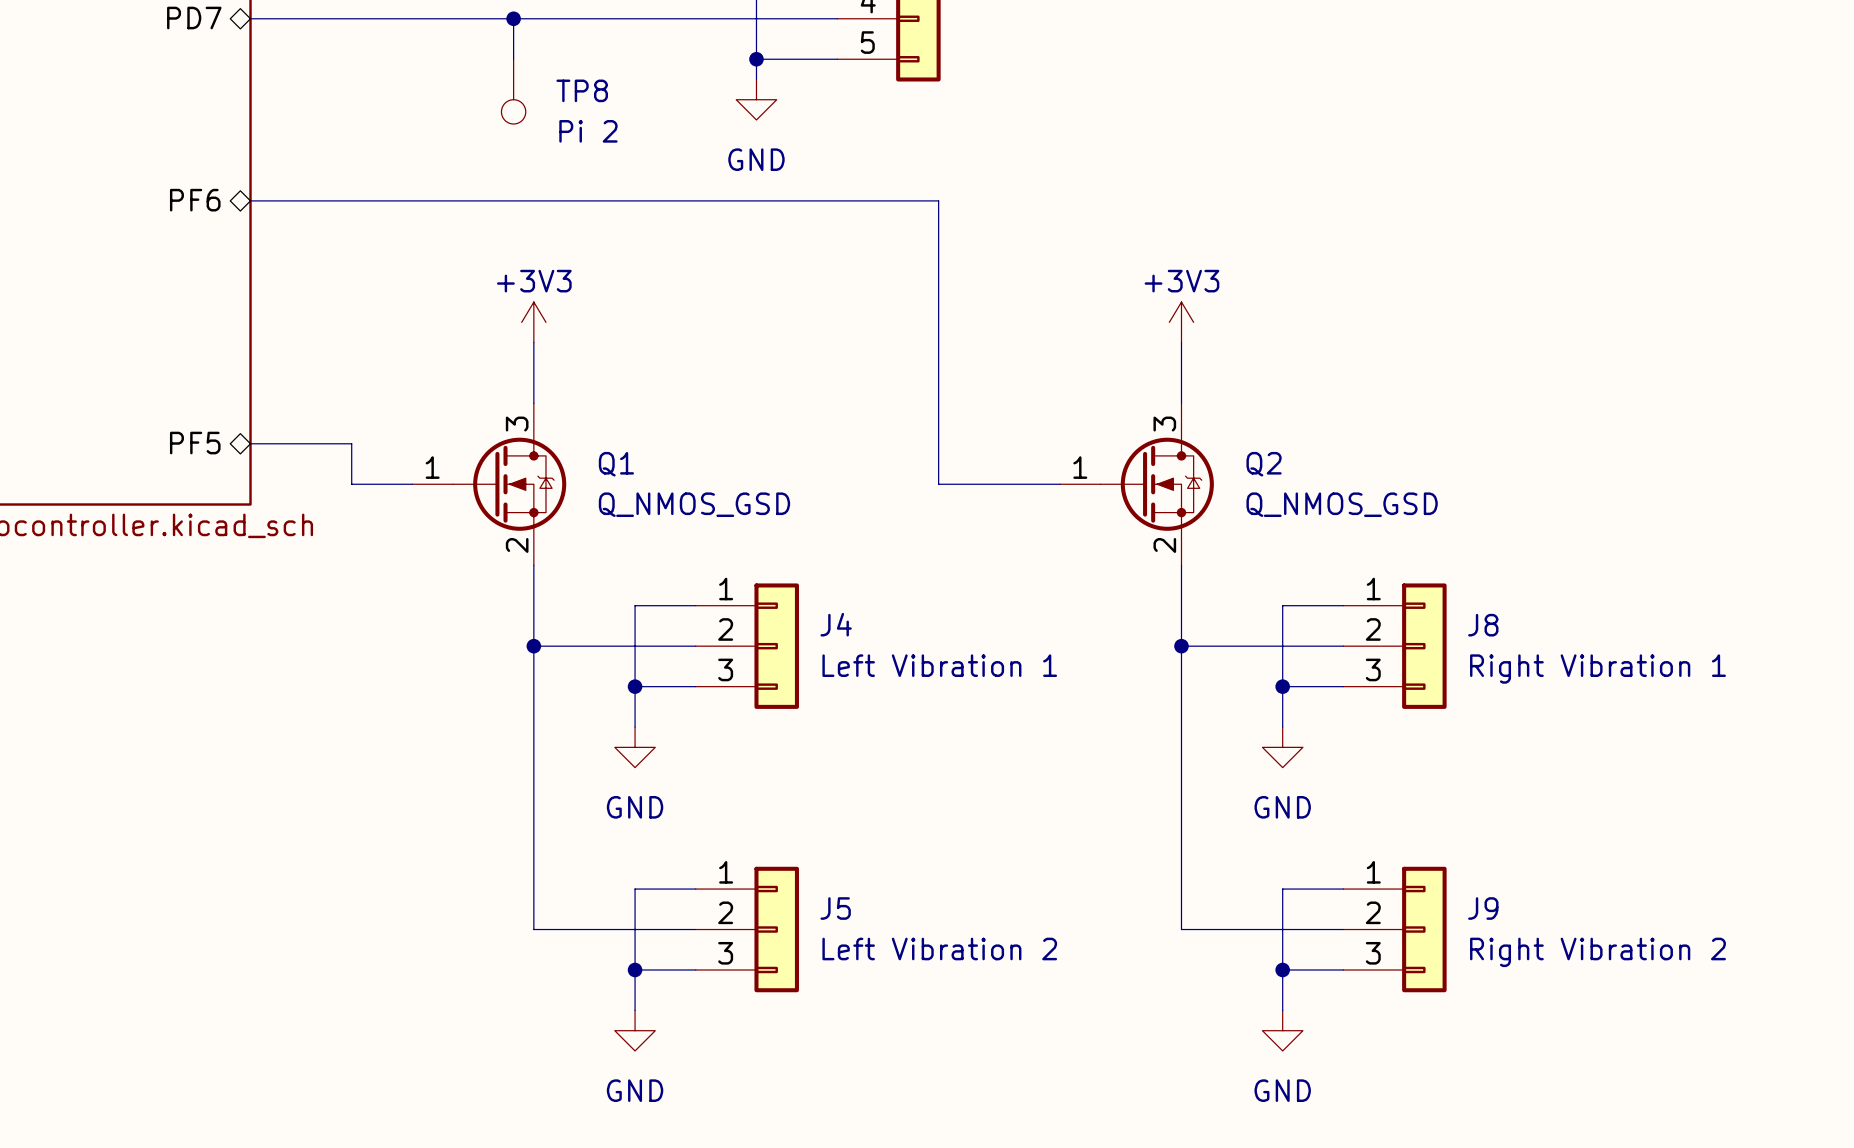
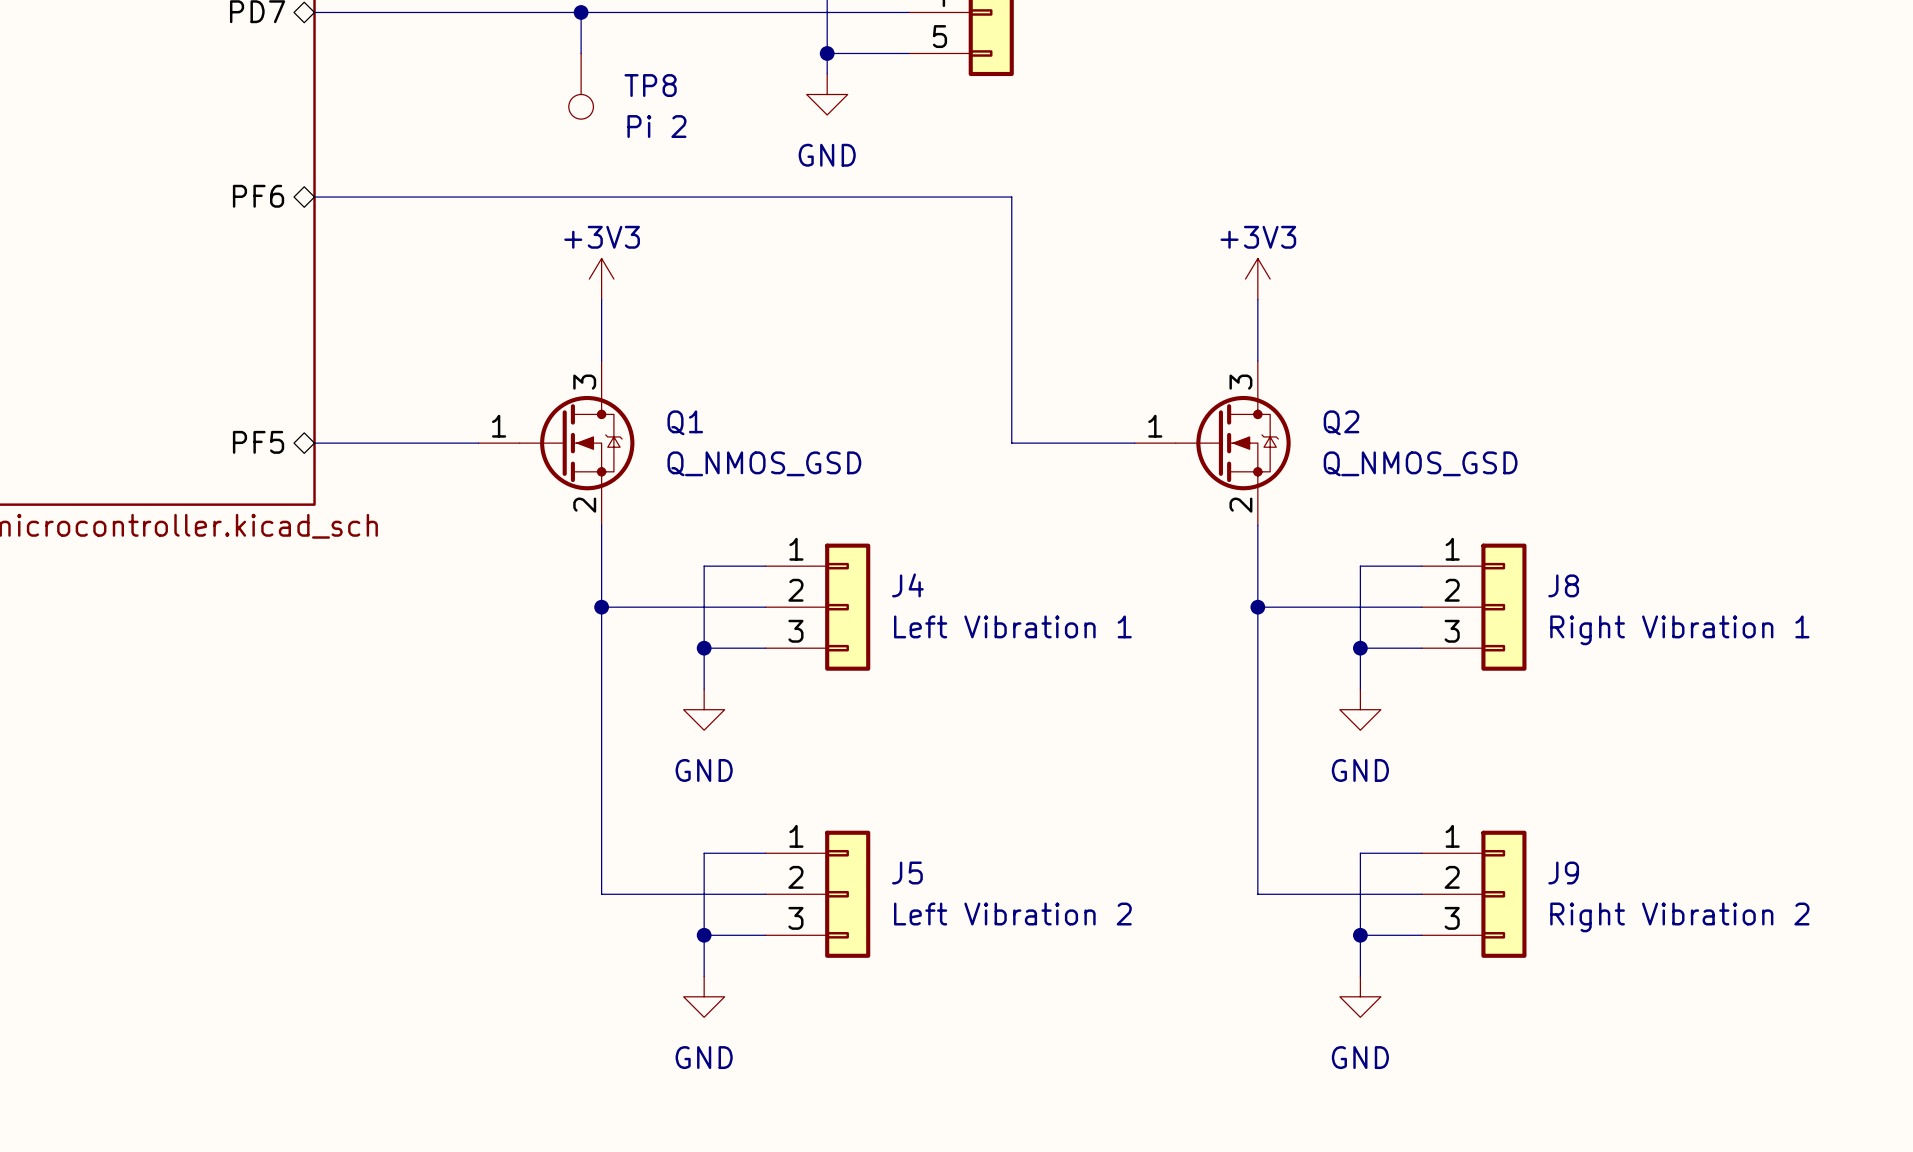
power symbol position: +3V3 (533, 322) -> +3V3 (601, 279)
power symbol position: +3V3 (1181, 322) -> +3V3 (1257, 279)
wire: (351, 443) (351, 484) (412, 484) -> (417, 443) (478, 443)
wire: (938, 443) (938, 484) (1060, 484) -> (1011, 443) (1134, 443)
Q1 position: (489, 484) -> (556, 443)
Q2 position: (1136, 484) -> (1212, 443)
wire: none -> (765, 566) (704, 566) (704, 607) (601, 607)
wire: none -> (1421, 566) (1360, 566) (1360, 607) (1257, 607)
wire: (533, 646) (635, 646) -> none
junction position: (533, 646) -> (601, 607)
J4 position: (747, 646) -> (817, 607)
wire: (1181, 646) (1282, 646) -> none
junction position: (1181, 646) -> (1257, 607)
J8 position: (1395, 646) -> (1474, 607)
junction position: (635, 686) -> (704, 648)
wire: (695, 686) (635, 686) (635, 727) -> none
junction position: (1282, 686) -> (1360, 648)
wire: (1343, 686) (1282, 686) (1282, 727) -> none
power symbol position: GND (635, 747) -> GND (704, 709)
power symbol position: GND (1282, 747) -> GND (1360, 709)
wire: (533, 889) (533, 929) (635, 929) -> (601, 894) (704, 894) (704, 853) (765, 853)
wire: (1181, 889) (1181, 929) (1282, 929) -> (1257, 894) (1360, 894) (1360, 853) (1421, 853)
J5 position: (747, 929) -> (817, 894)
J9 position: (1395, 929) -> (1474, 894)
junction position: (635, 969) -> (704, 935)
wire: (695, 969) (635, 969) (635, 1010) -> none
junction position: (1282, 969) -> (1360, 935)
wire: (1343, 969) (1282, 969) (1282, 1010) -> none
power symbol position: GND (635, 1030) -> GND (704, 996)
power symbol position: GND (1282, 1030) -> GND (1360, 996)

